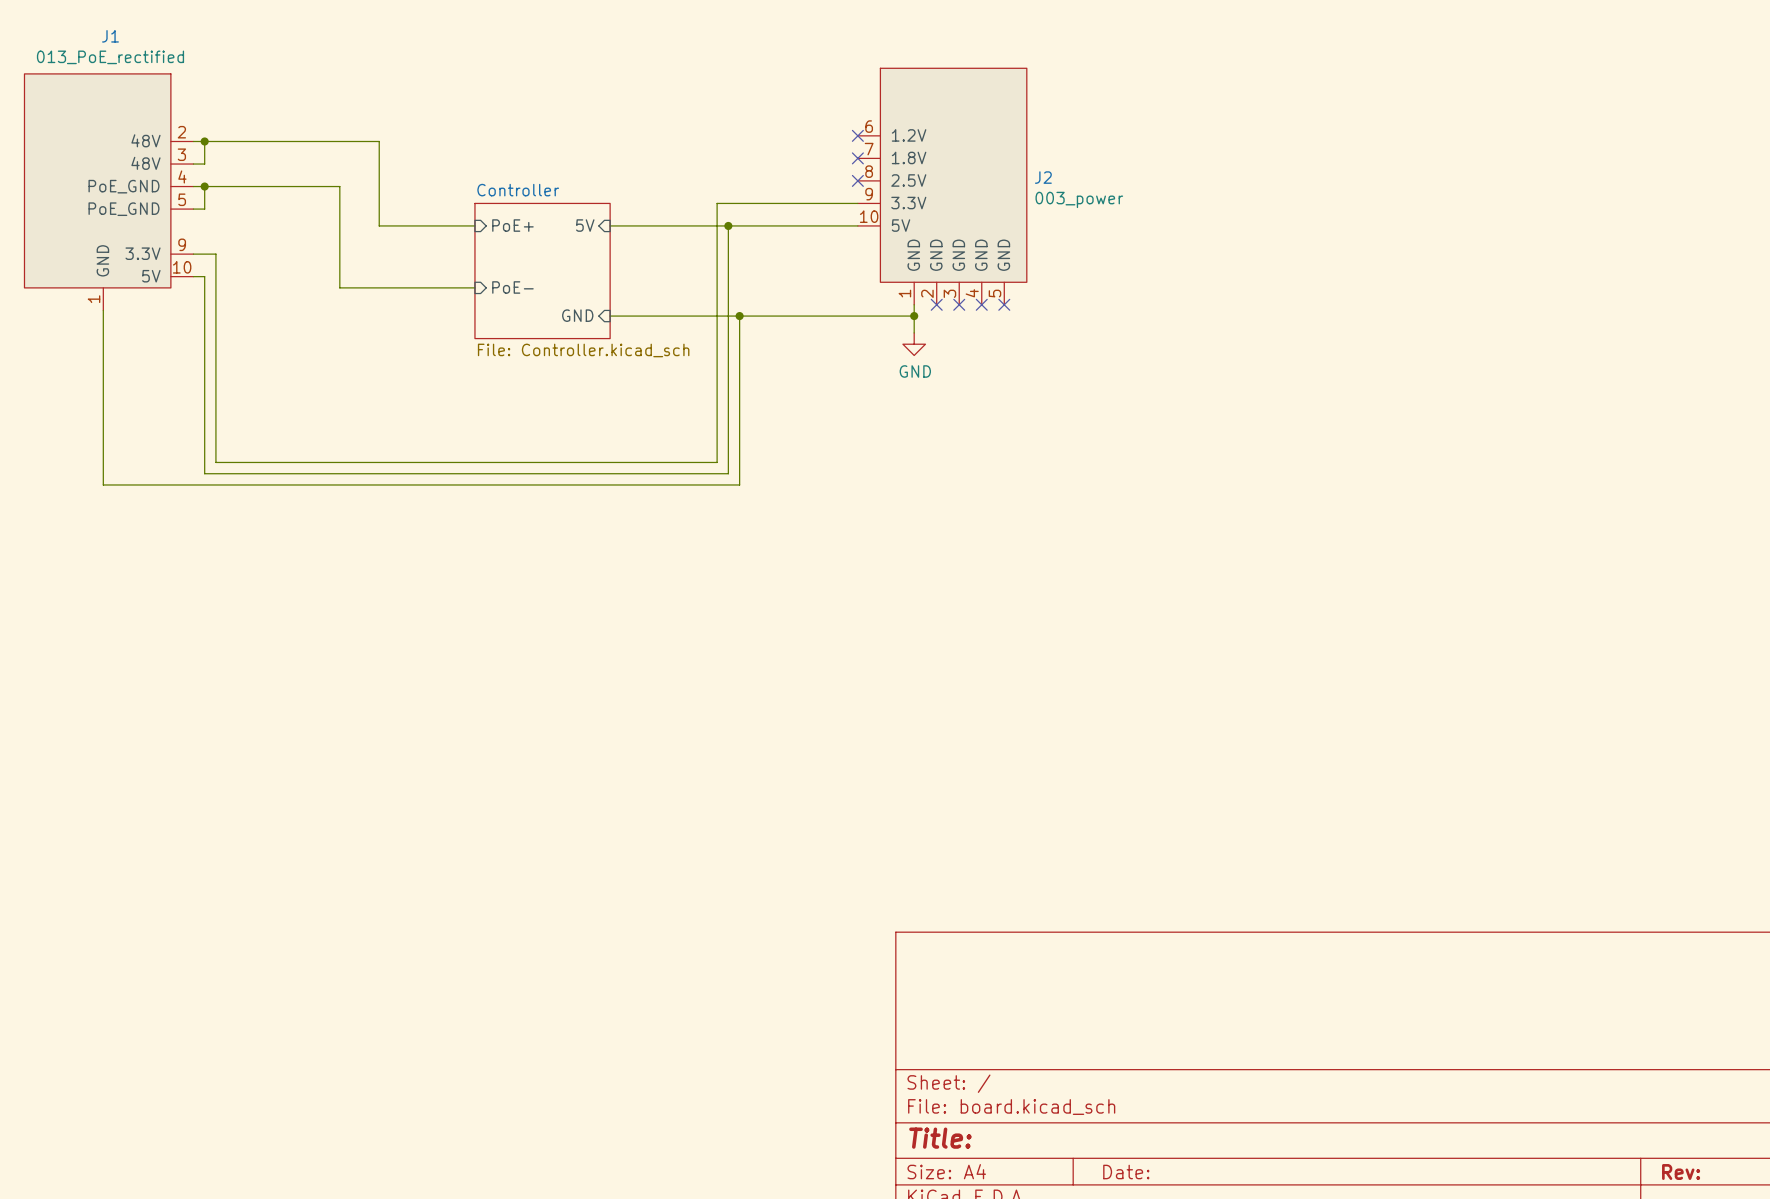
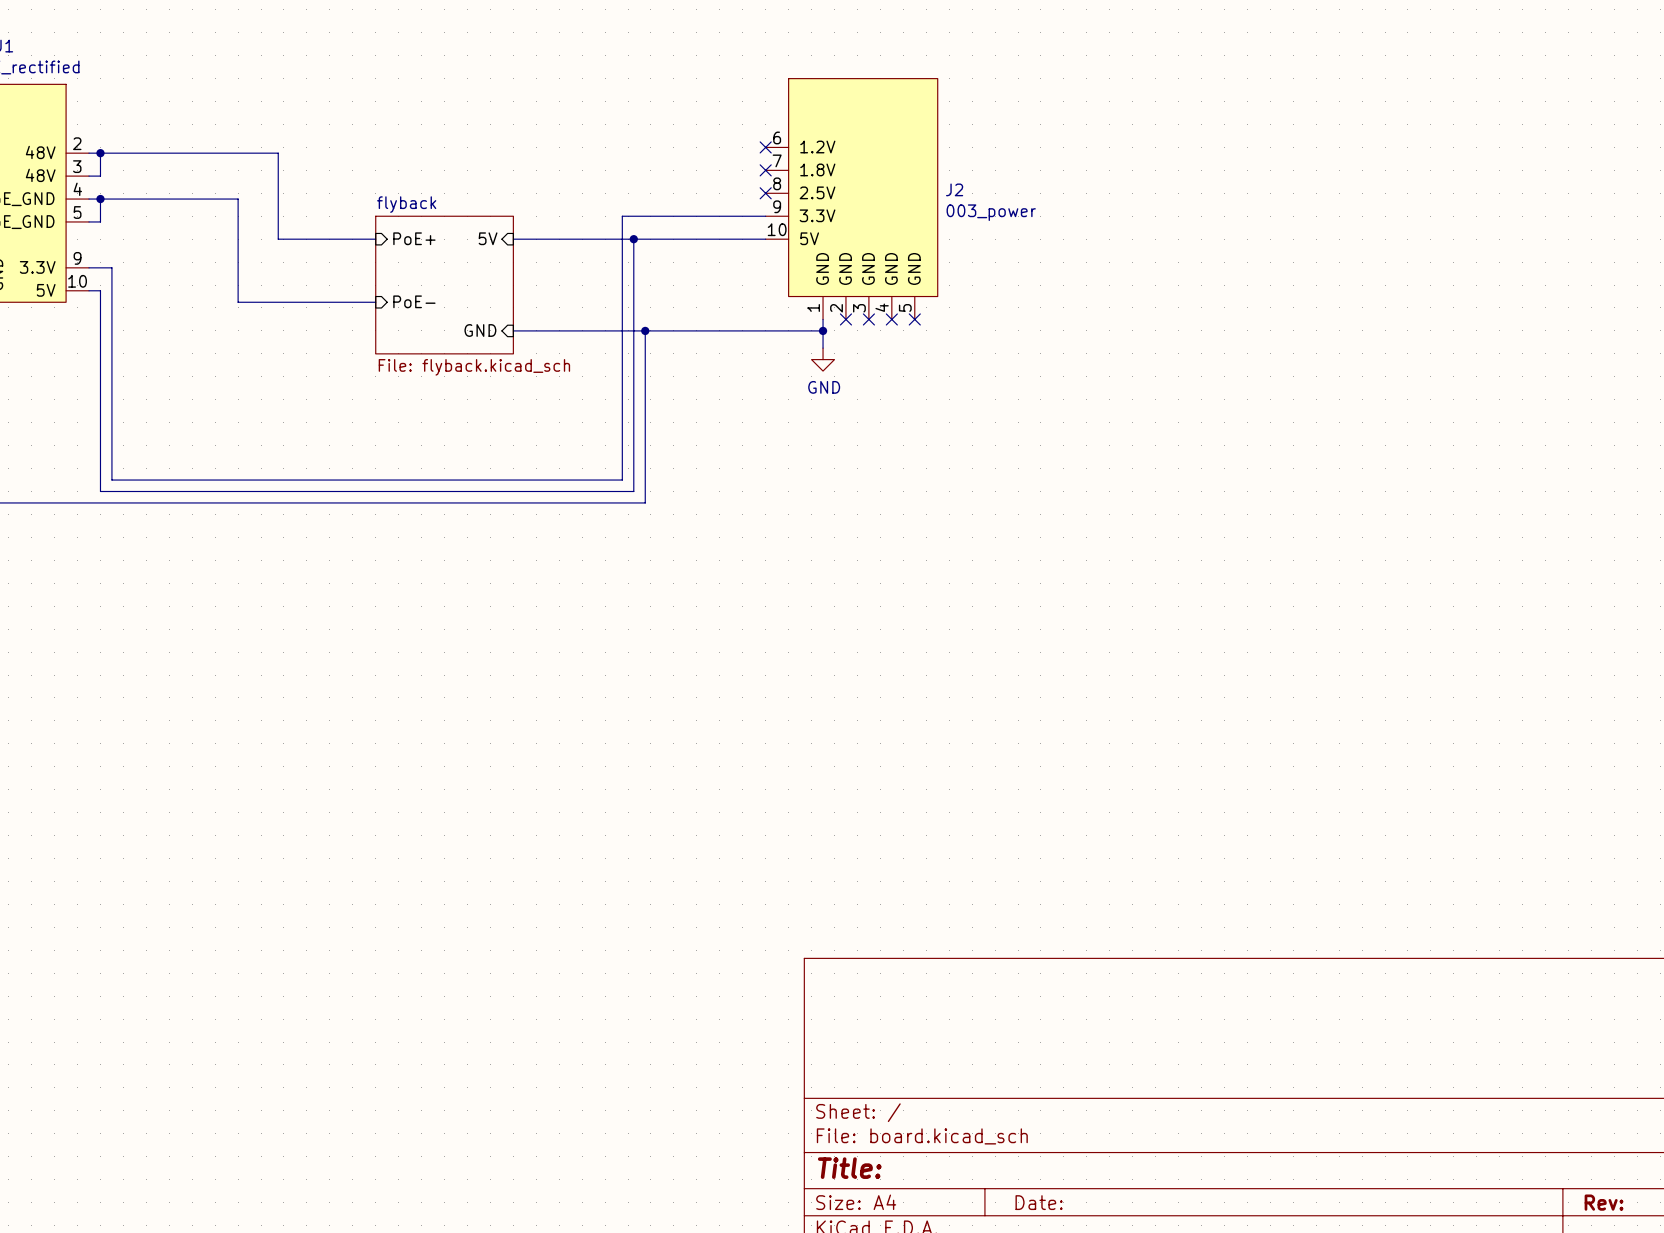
sheet Controller name: Controller (518, 190) -> flyback (406, 204)
sheet Controller value: File: Controller.kicad_sch (583, 350) -> File: flyback.kicad_sch (474, 367)

